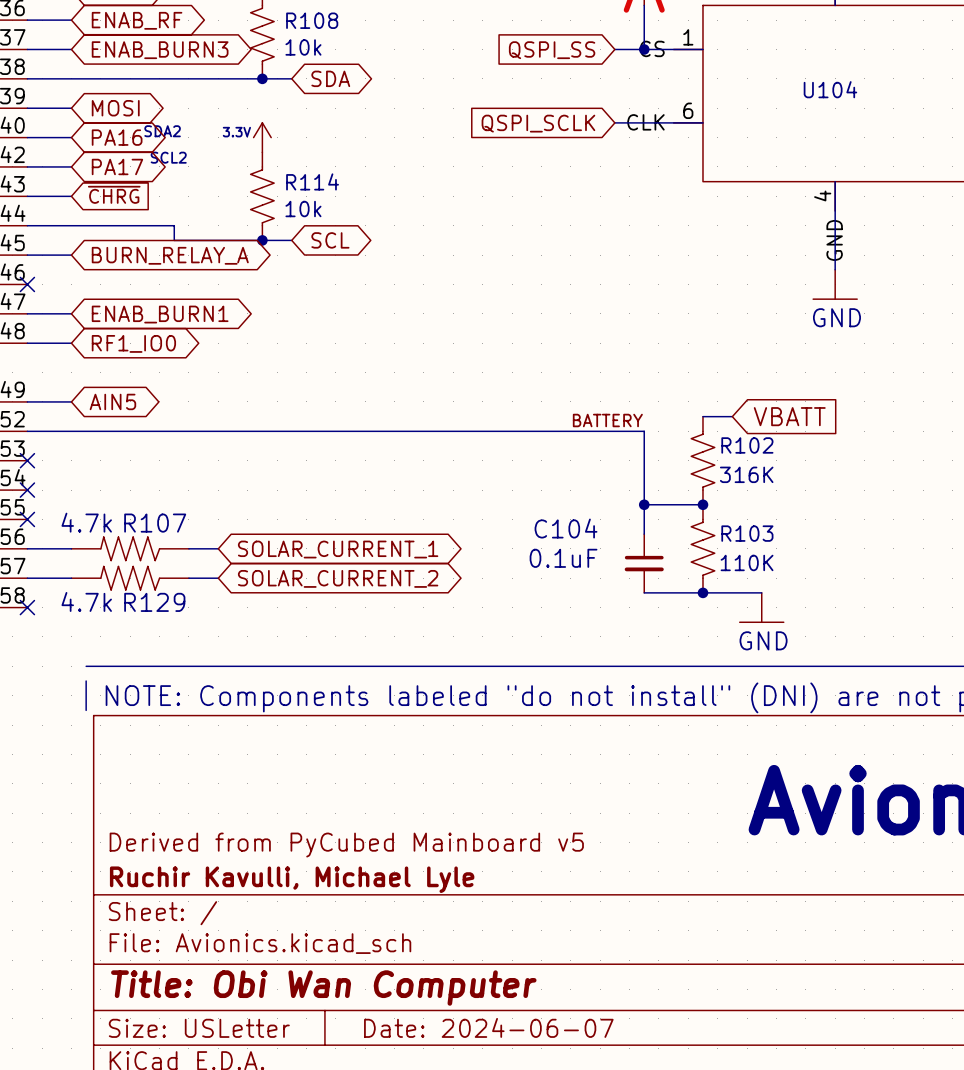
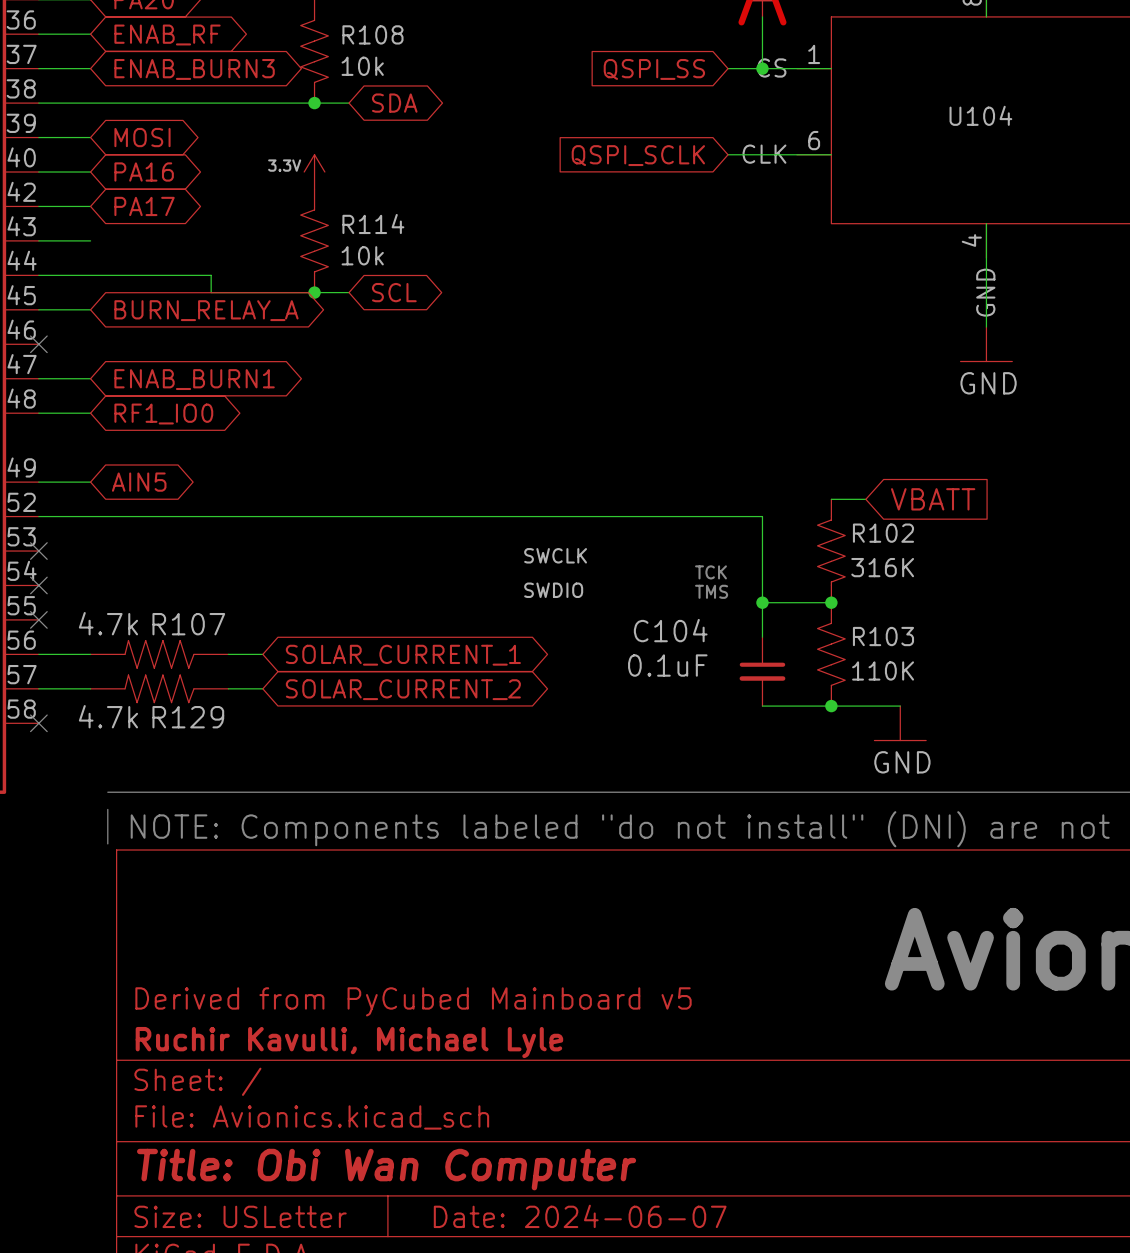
text: SDA2 (162, 131) -> none
text: SCL2 (168, 157) -> none
global label: ~{CHRG} (114, 194) -> none
label: BATTERY (607, 420) -> none
label: none -> SWCLK (555, 555)
text: none -> TCK (710, 572)
label: none -> SWDIO (553, 590)
text: none -> TMS (711, 591)

